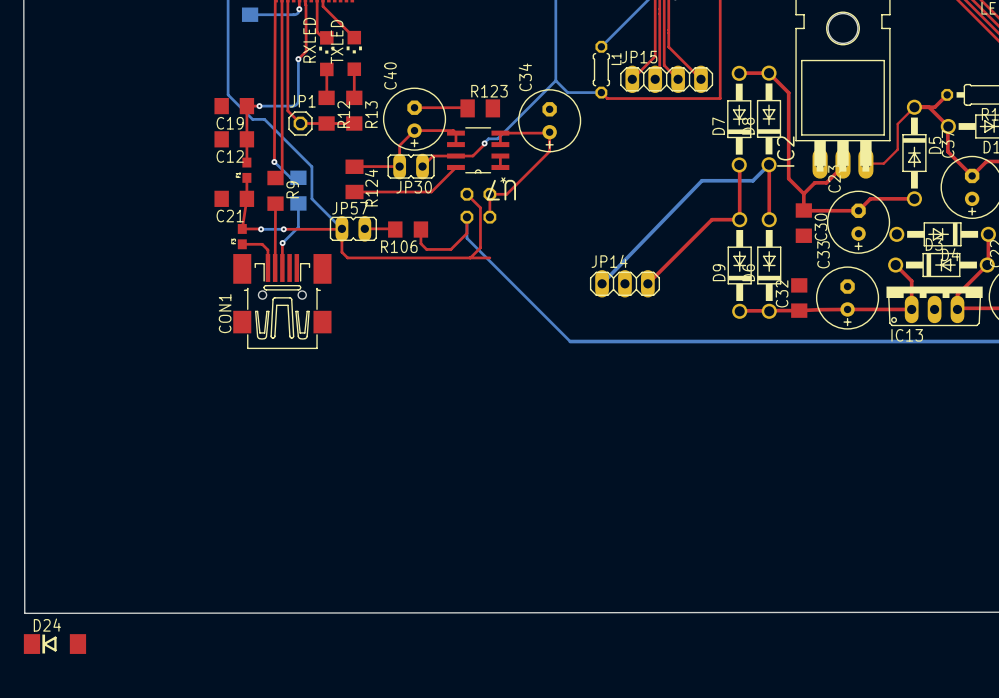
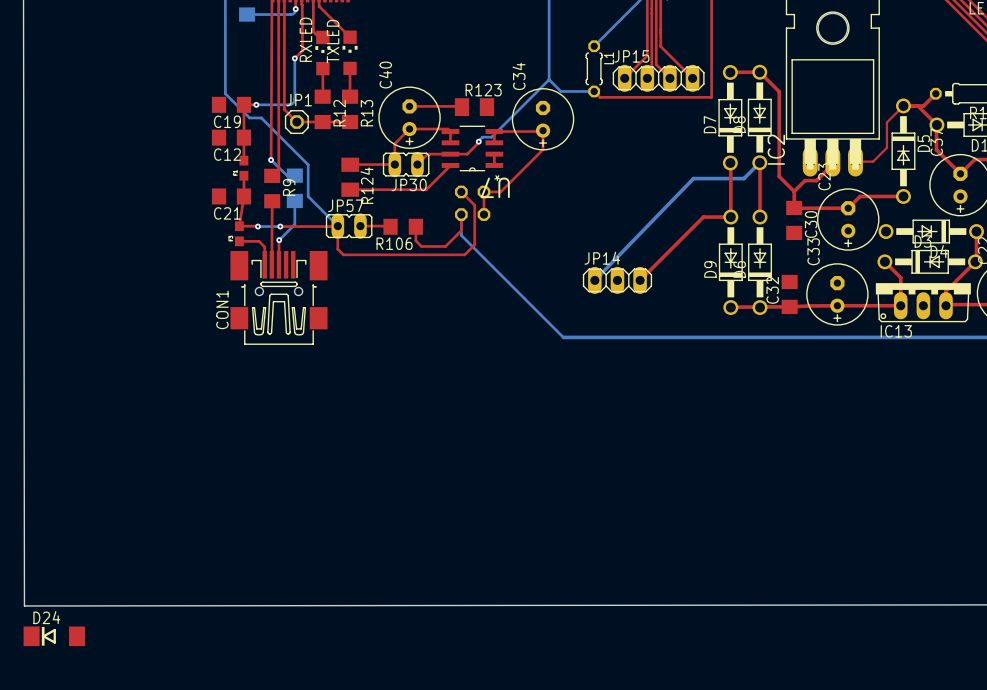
top track: (470, 257) (489, 257) -> none

